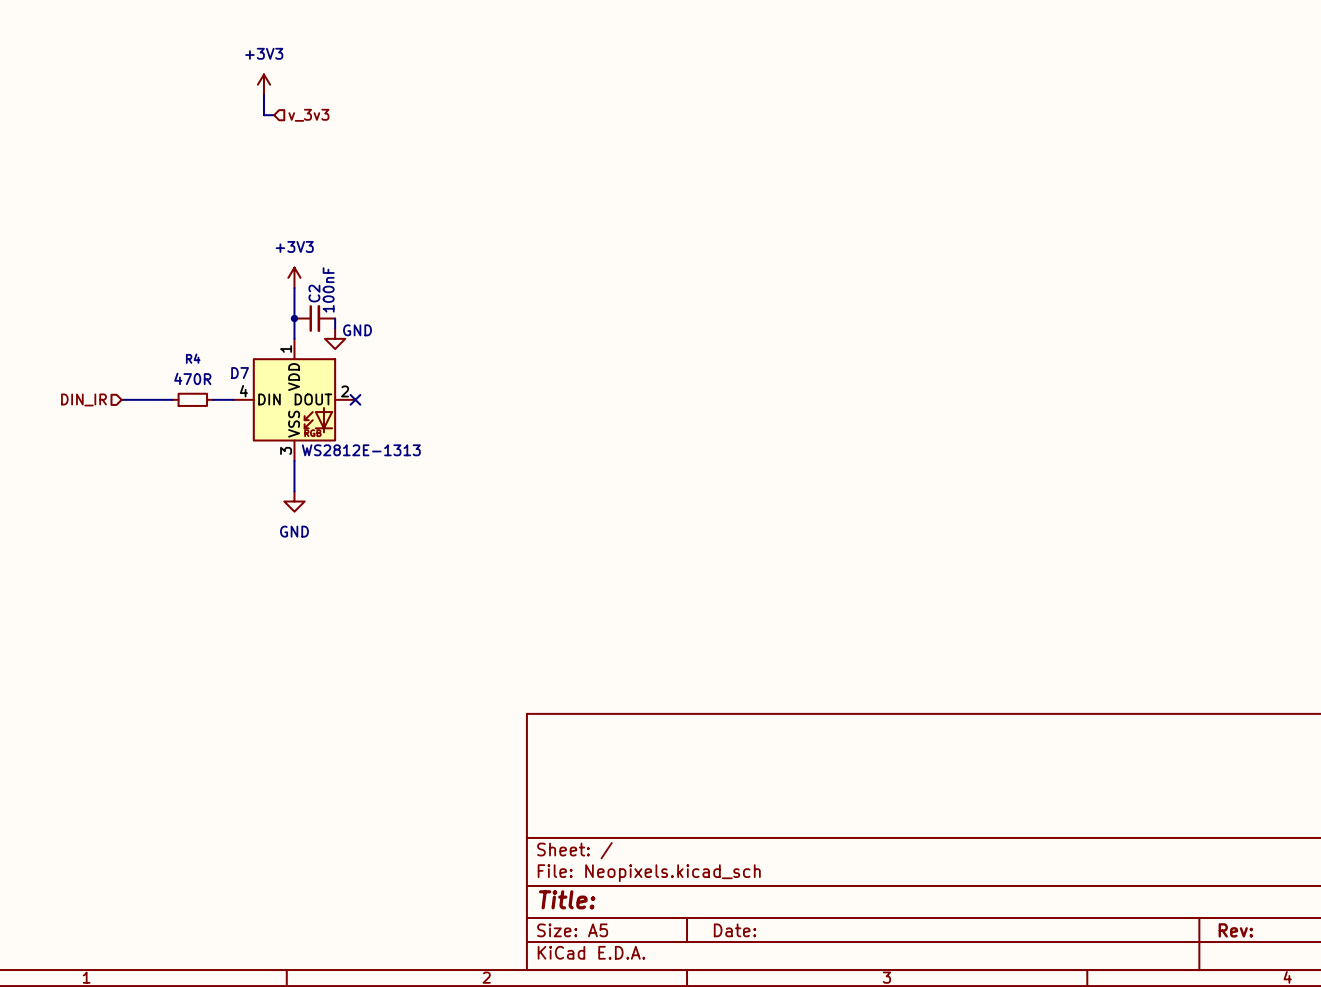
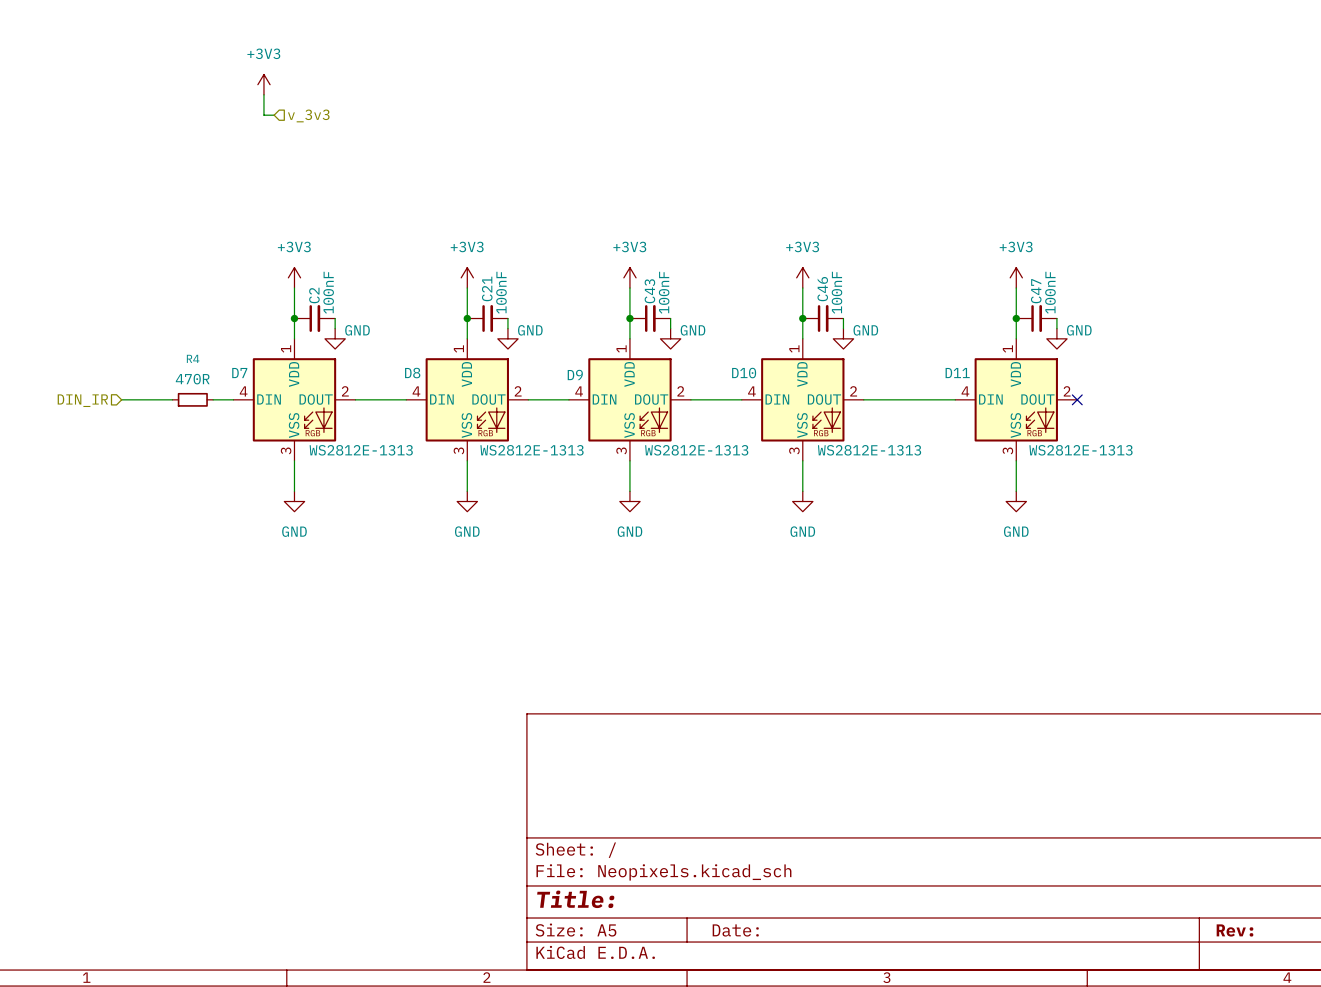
power symbol: none -> +3V3 (467, 277)
power symbol: none -> +3V3 (629, 277)
power symbol: none -> +3V3 (802, 277)
power symbol: none -> +3V3 (1016, 277)
wire: none -> (467, 288) (467, 338)
wire: none -> (629, 288) (629, 338)
wire: none -> (802, 288) (802, 338)
wire: none -> (1016, 288) (1016, 338)
junction: none -> (467, 318)
C21: none -> 100nF (487, 318)
wire: none -> (507, 318) (507, 328)
junction: none -> (629, 318)
C43: none -> 100nF (650, 318)
wire: none -> (670, 318) (670, 328)
junction: none -> (802, 318)
C46: none -> 100nF (823, 318)
wire: none -> (843, 318) (843, 328)
junction: none -> (1016, 318)
C47: none -> 100nF (1036, 318)
wire: none -> (1056, 318) (1056, 328)
power symbol: none -> GND (507, 338)
power symbol: none -> GND (670, 338)
power symbol: none -> GND (843, 338)
power symbol: none -> GND (1056, 338)
wire: none -> (355, 399) (406, 399)
no-connect mark: (355, 399) -> none
D8: none -> WS2812E-1313 (467, 399)
wire: none -> (528, 399) (568, 399)
D9: none -> WS2812E-1313 (629, 399)
wire: none -> (690, 399) (741, 399)
D10: none -> WS2812E-1313 (802, 399)
wire: none -> (863, 399) (955, 399)
D11: none -> WS2812E-1313 (1016, 399)
no-connect mark: none -> (1077, 399)
wire: none -> (467, 460) (467, 491)
wire: none -> (629, 460) (629, 491)
wire: none -> (802, 460) (802, 491)
wire: none -> (1016, 460) (1016, 491)
power symbol: none -> GND (467, 501)
power symbol: none -> GND (629, 501)
power symbol: none -> GND (802, 501)
power symbol: none -> GND (1016, 501)

